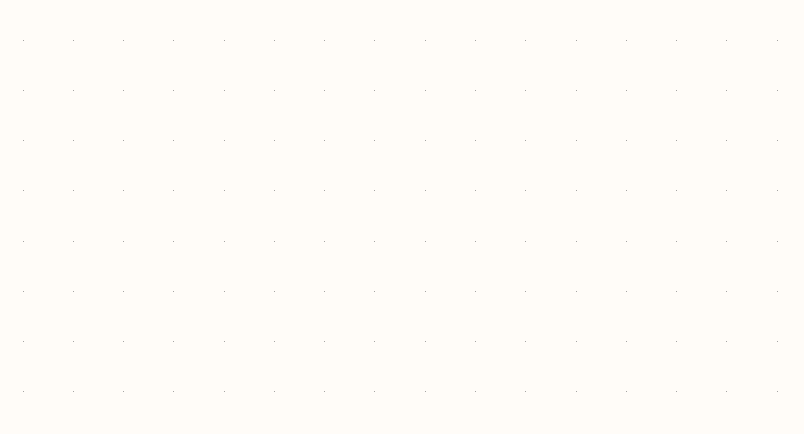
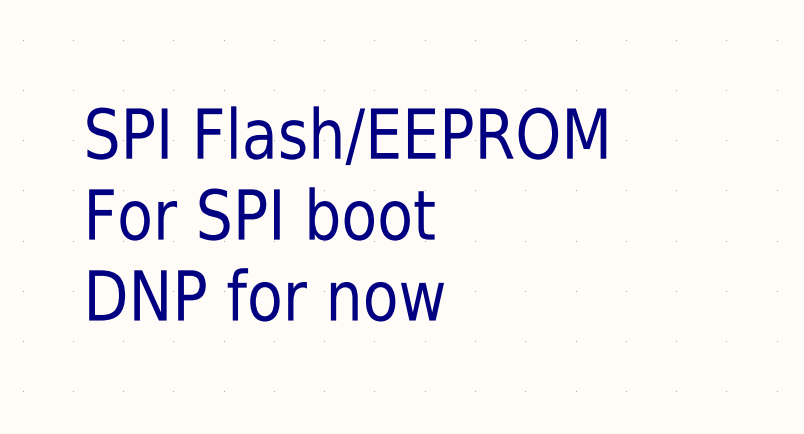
text: none -> SPI Flash/EEPROM (346, 135)
text: none -> For SPI boot (261, 213)
text: none -> DNP for now (266, 294)

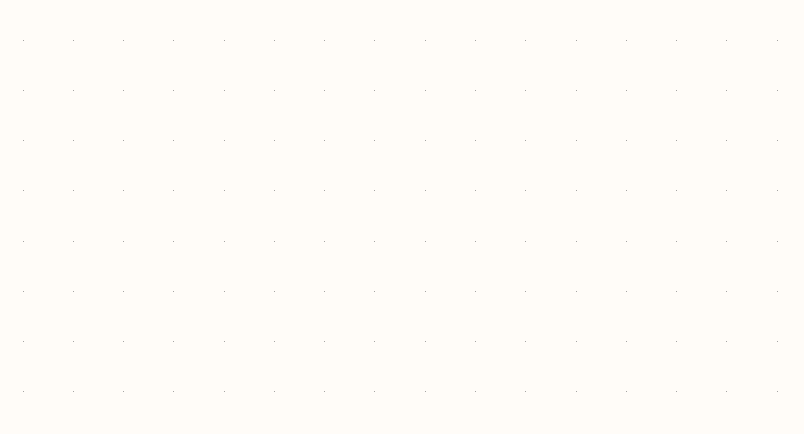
text: SPI Flash/EEPROM (346, 135) -> none
text: For SPI boot (261, 213) -> none
text: DNP for now (266, 294) -> none

